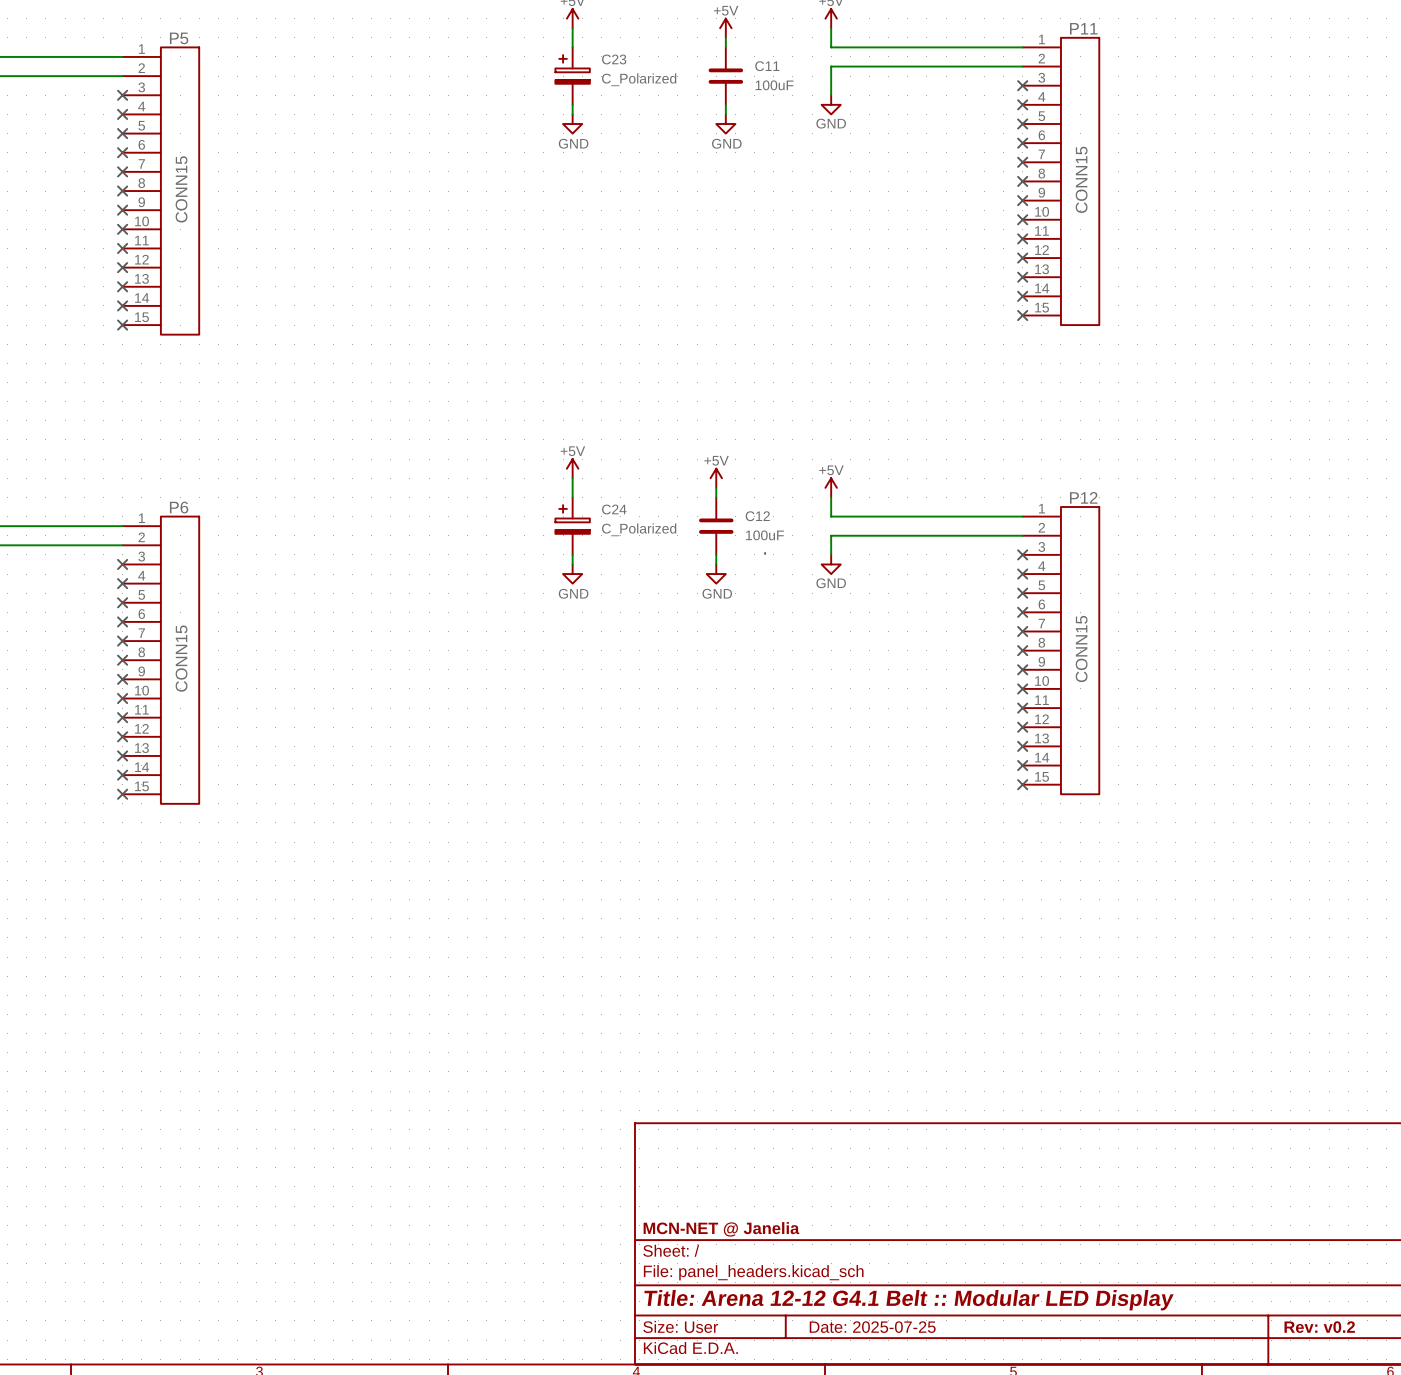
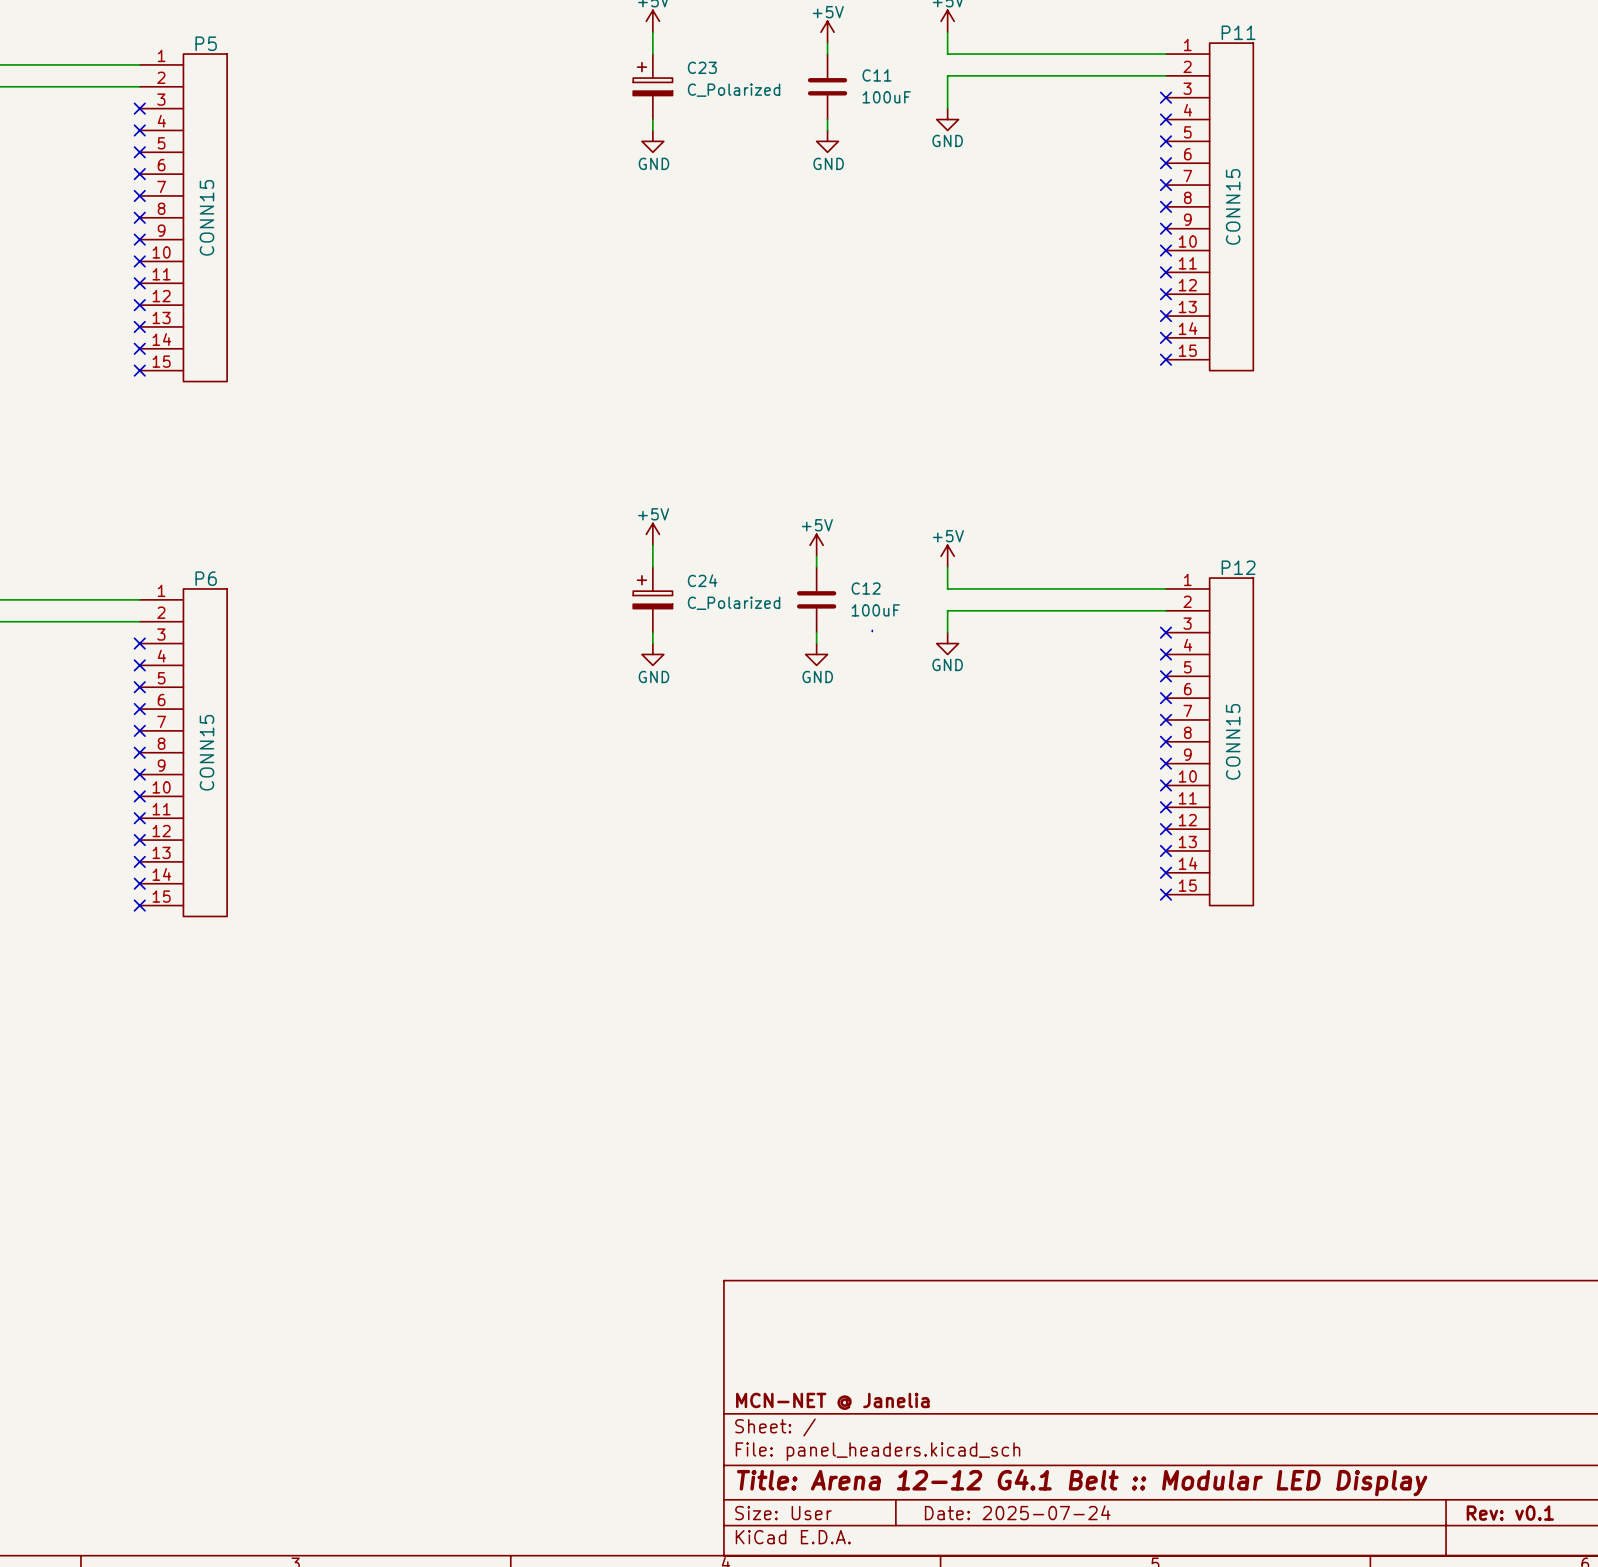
title block: Date: 2025-07-25 (872, 1327) -> Date: 2025-07-24 (1017, 1512)
title block: Rev: v0.2 (1319, 1327) -> Rev: v0.1 (1510, 1513)

